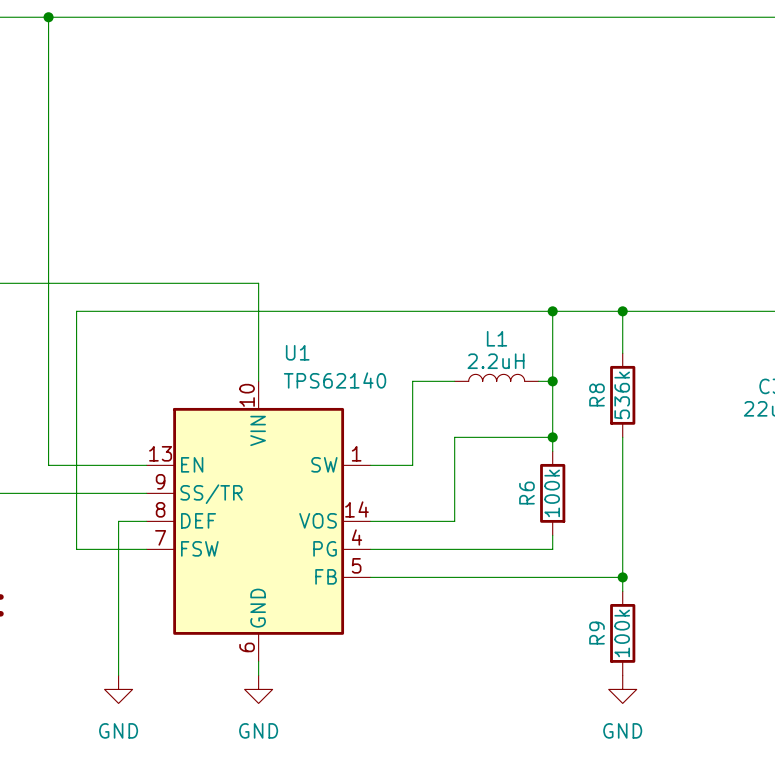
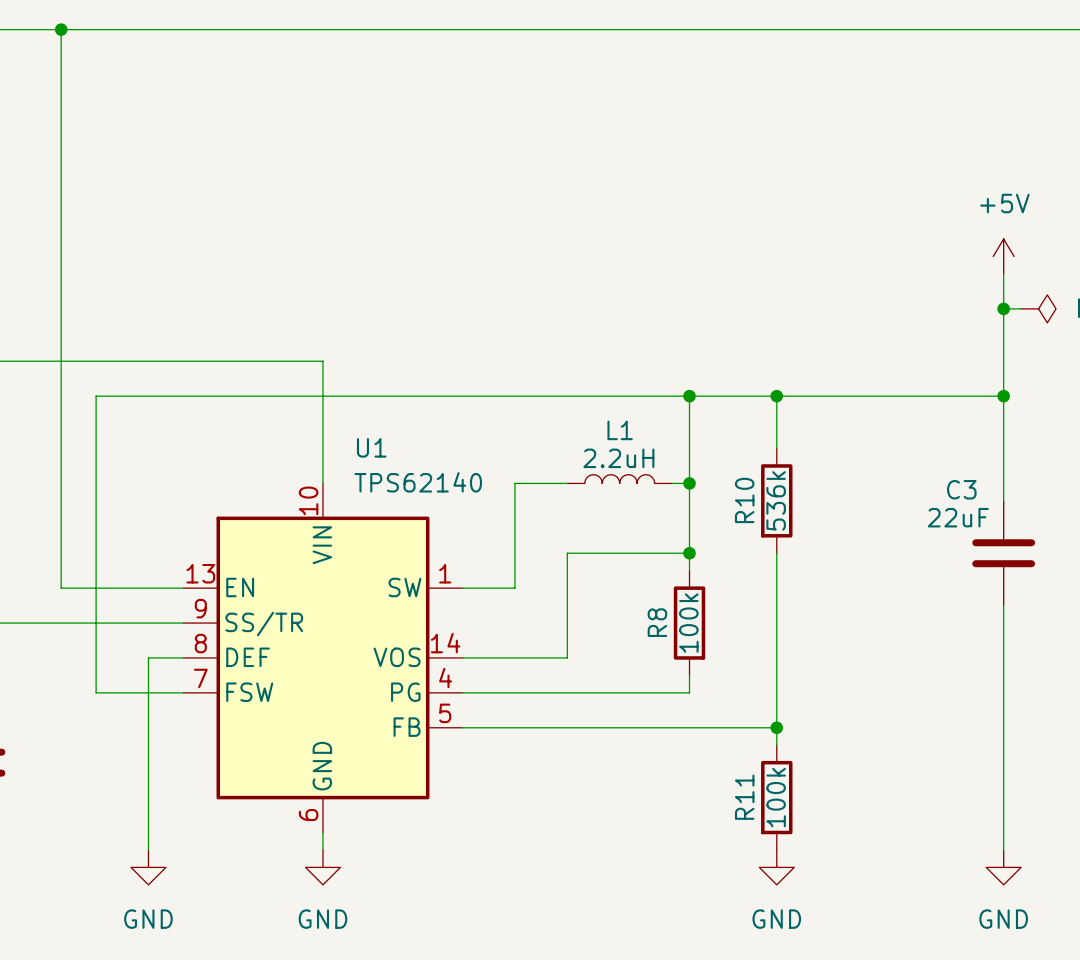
R8 name: R8 (596, 395) -> R10 (744, 500)
R6 name: R6 (526, 493) -> R8 (657, 622)
R9 name: R9 (596, 633) -> R11 (744, 797)

